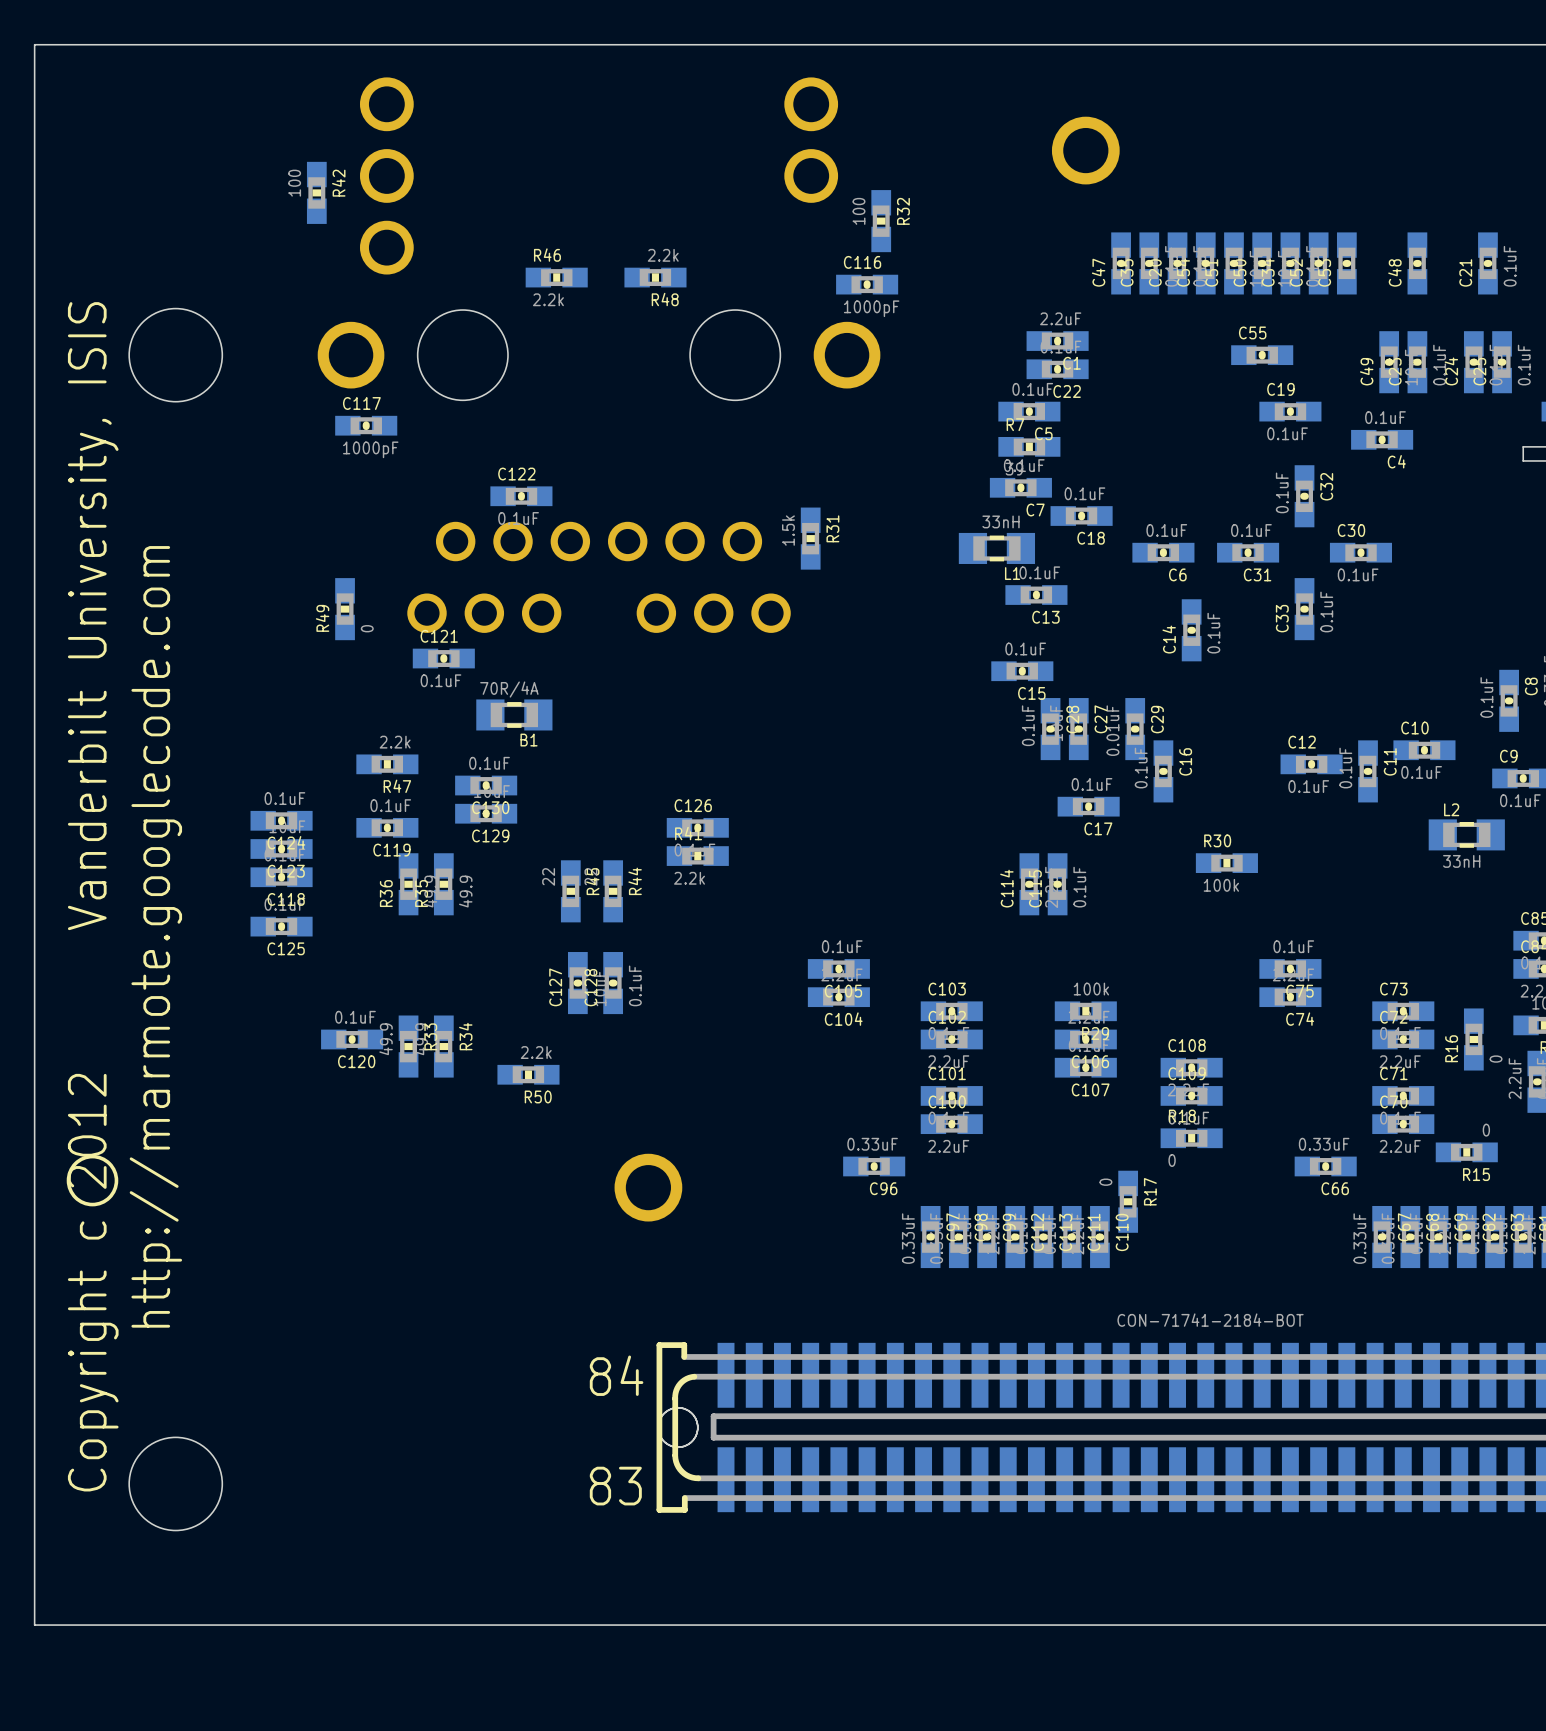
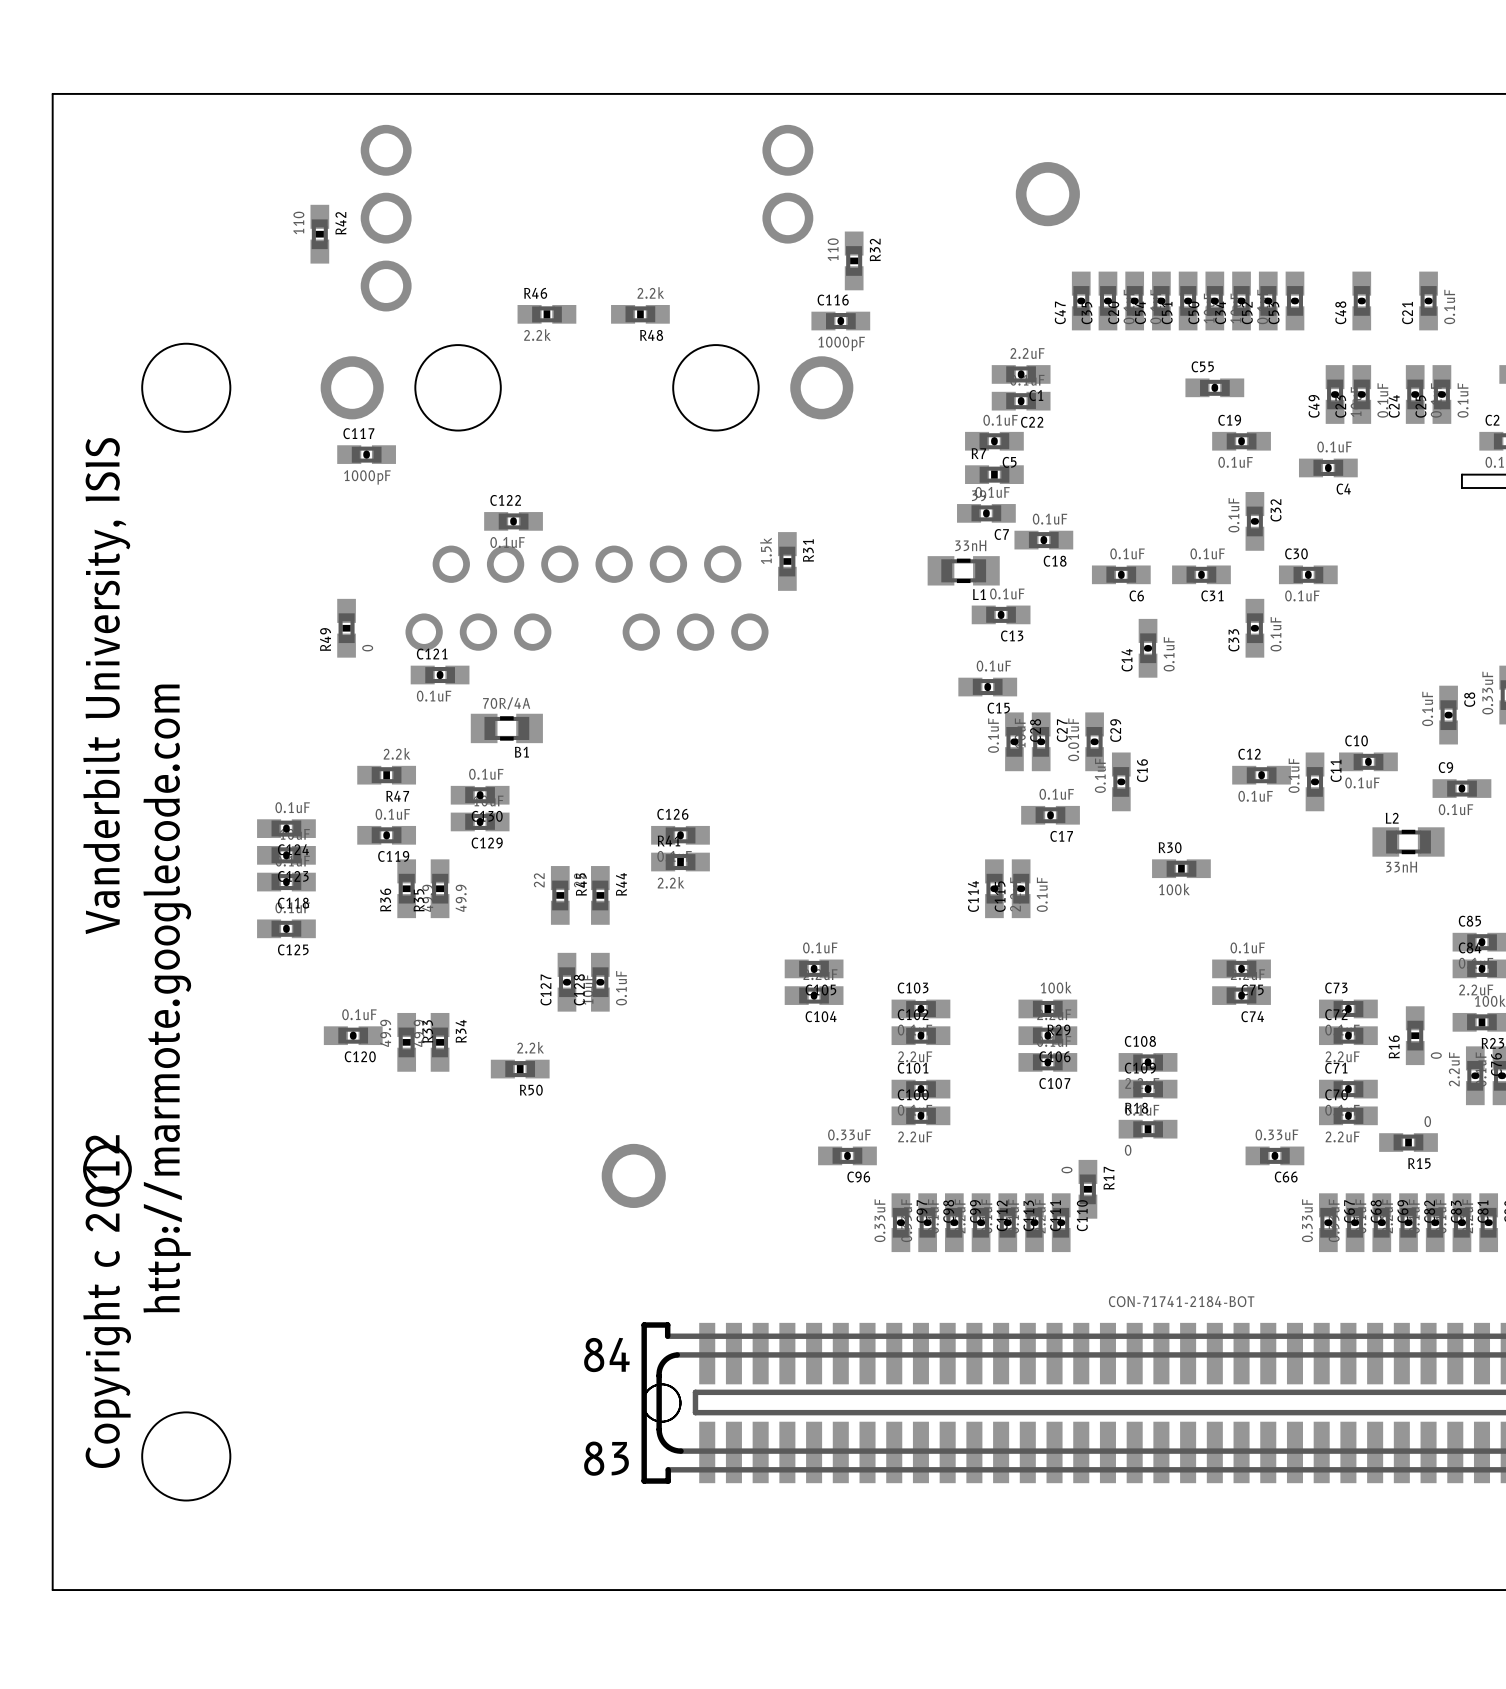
R42 value: 100 (294, 183) -> 110 (298, 222)
R32 value: 100 (859, 211) -> 110 (833, 249)

